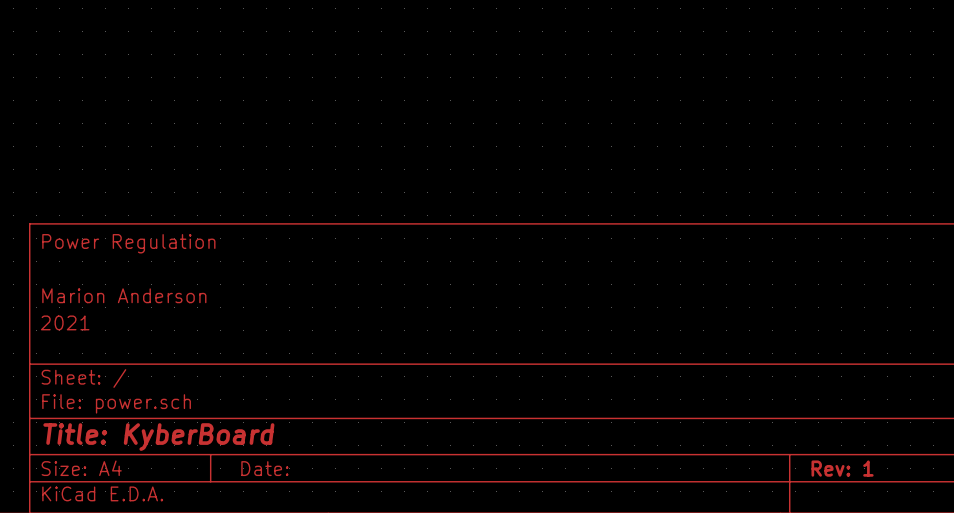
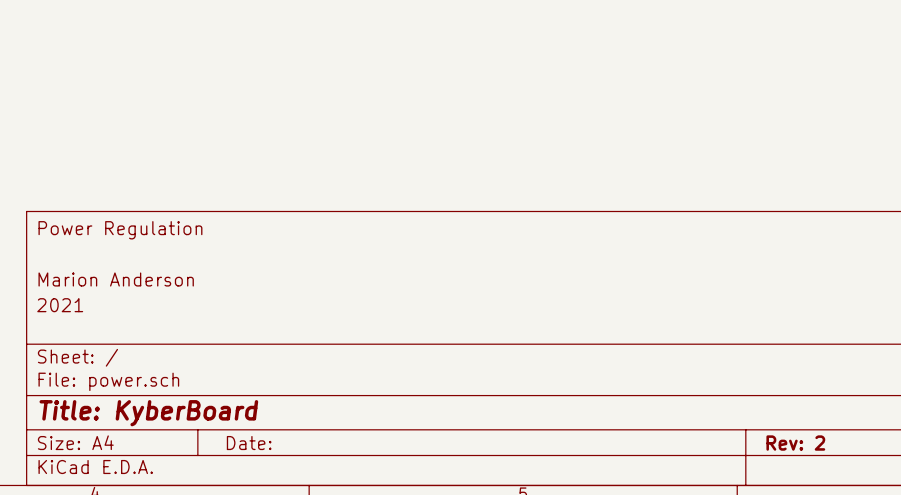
title block: Rev: 1 (842, 468) -> Rev: 2 (795, 443)

